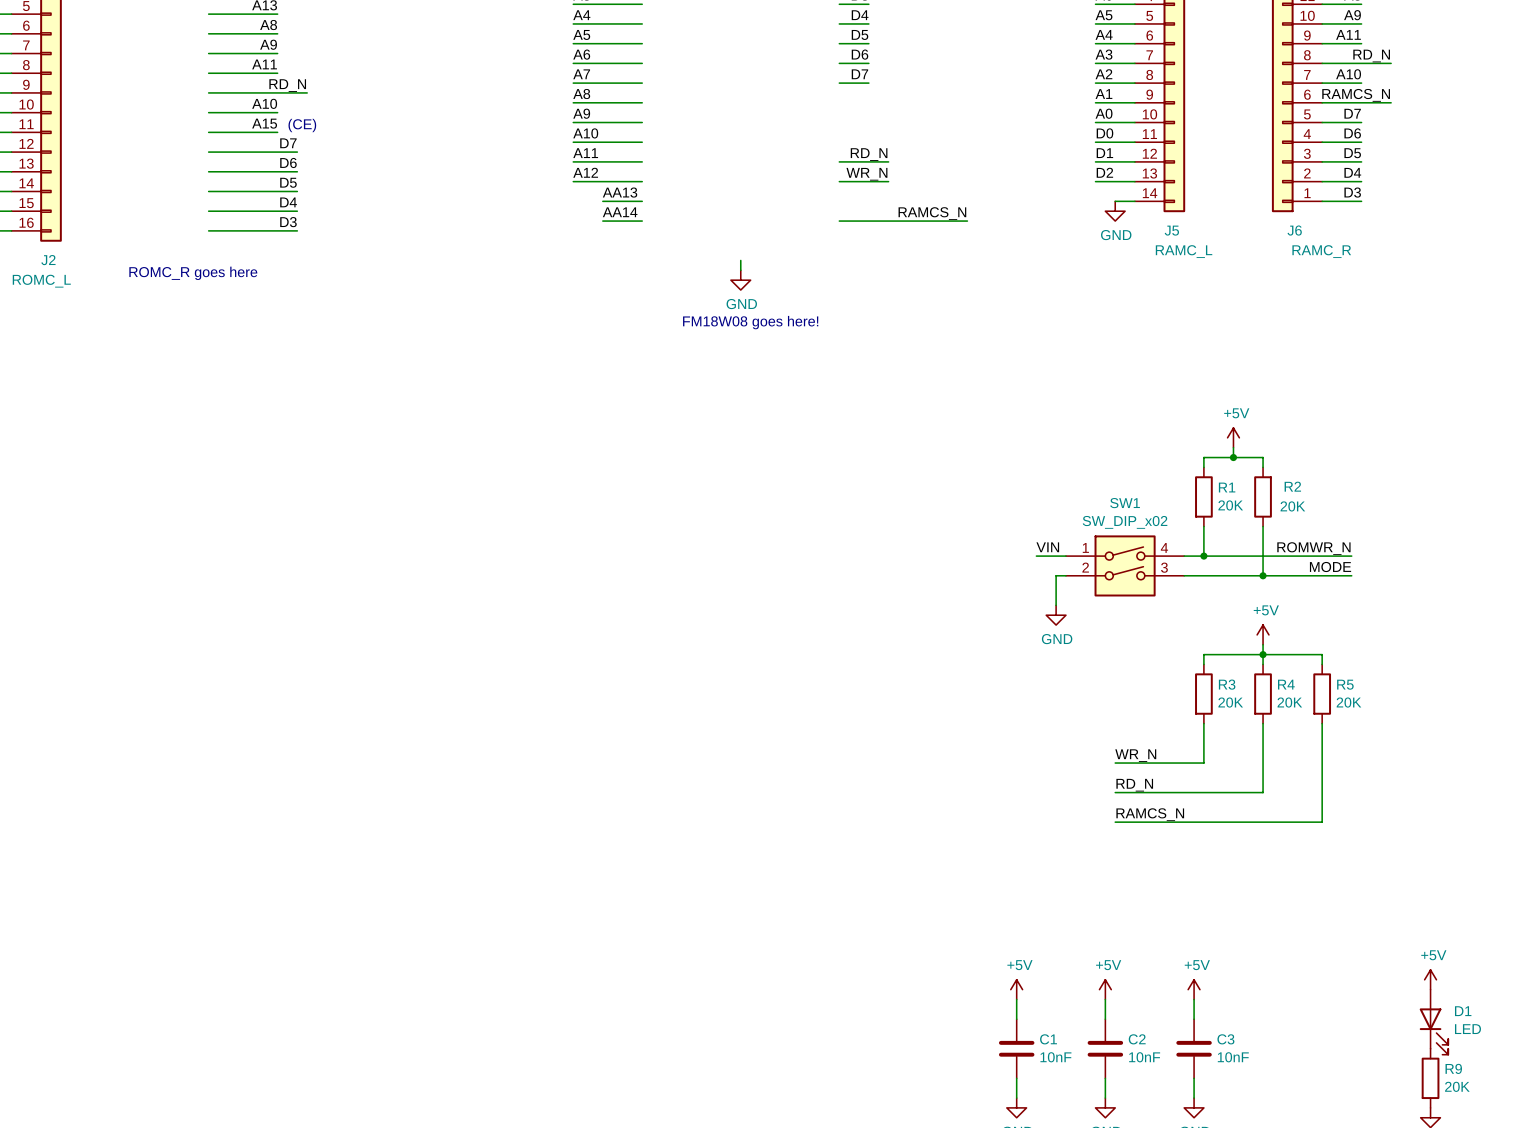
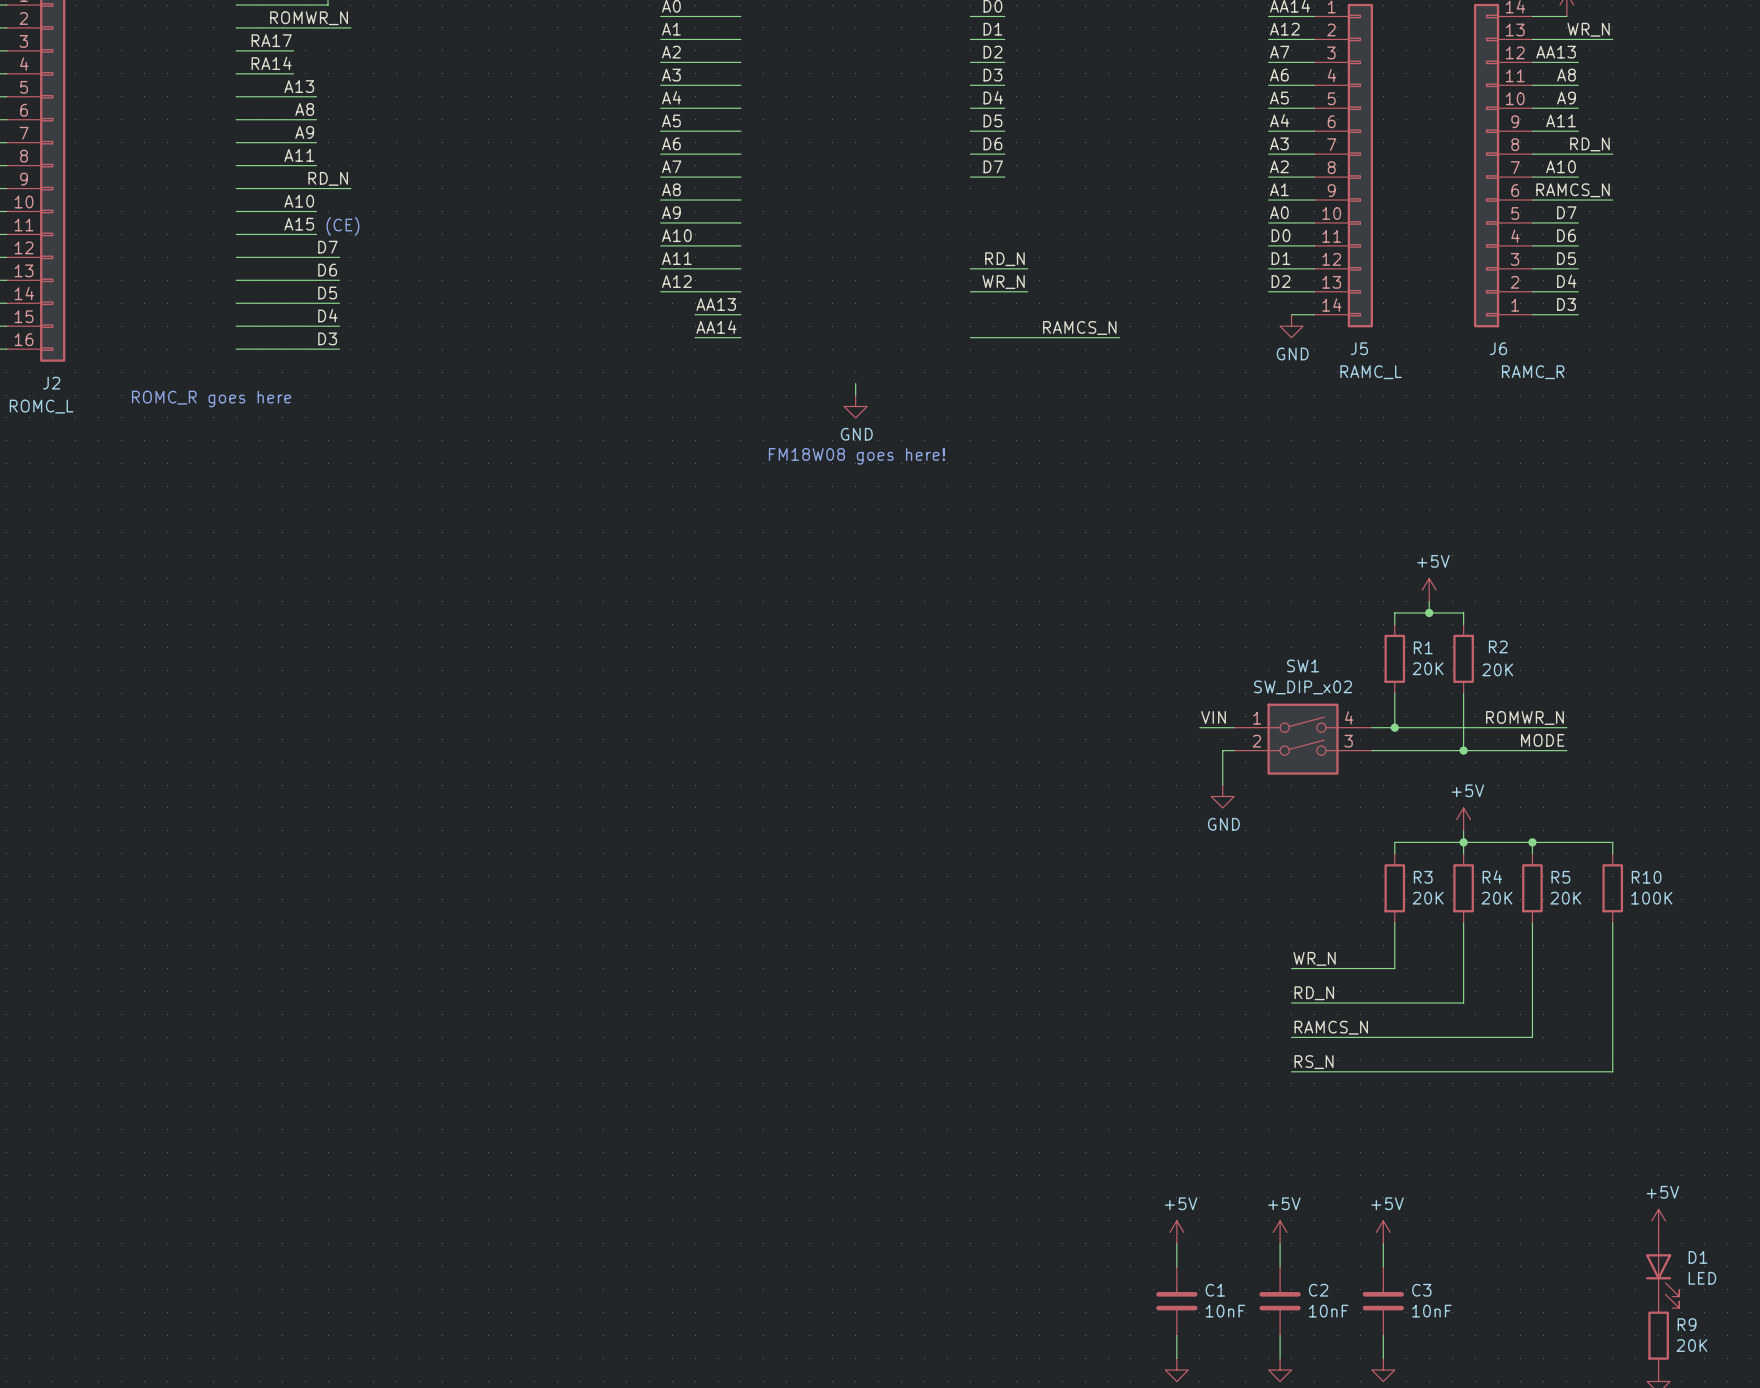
wire: none -> (1532, 842) (1612, 842) (1612, 853)
junction: none -> (1532, 842)
R10: none -> 100K (1612, 888)
wire: none -> (1612, 922) (1612, 1071) (1291, 1071)
label: none -> RS_N (1314, 1062)

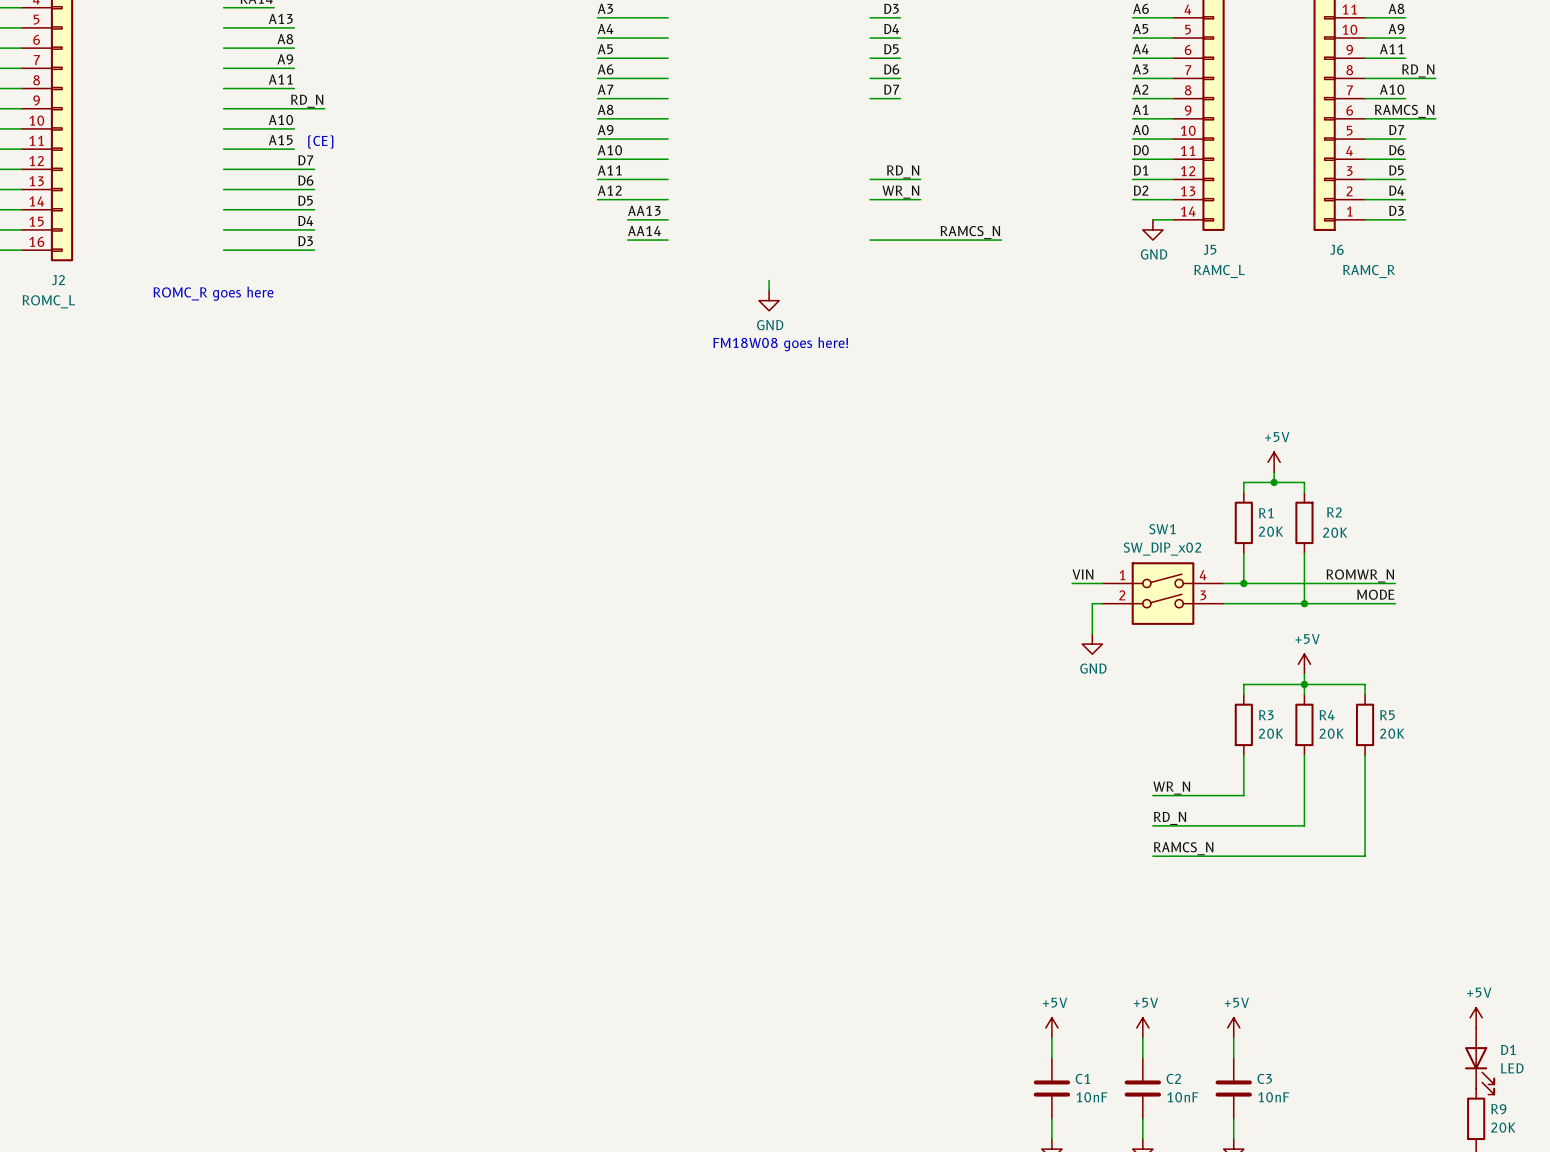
wire: (1532, 842) (1612, 842) (1612, 853) -> none
junction: (1532, 842) -> none
R10: 100K (1612, 888) -> none
wire: (1612, 922) (1612, 1071) (1291, 1071) -> none
label: RS_N (1314, 1062) -> none

